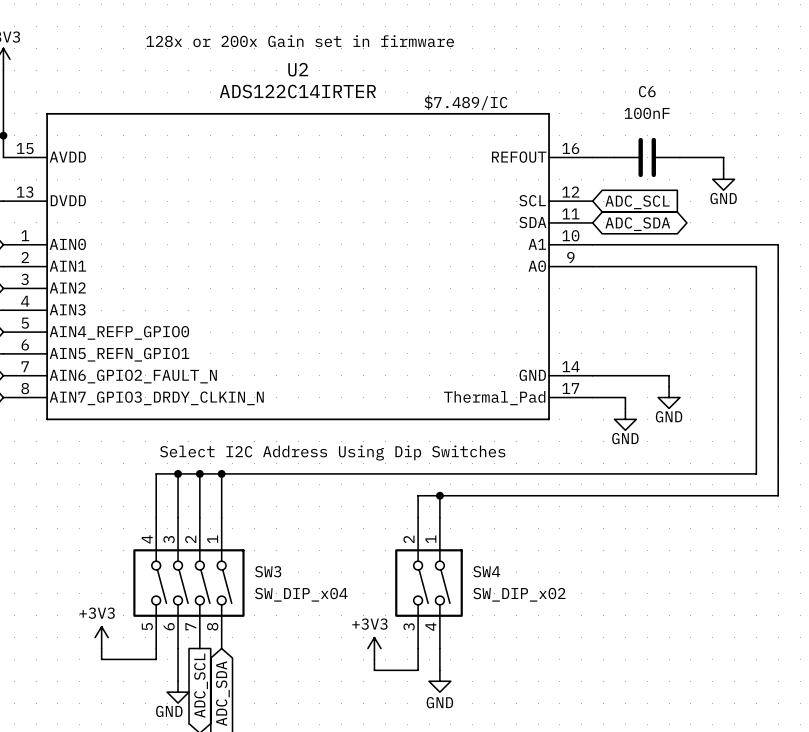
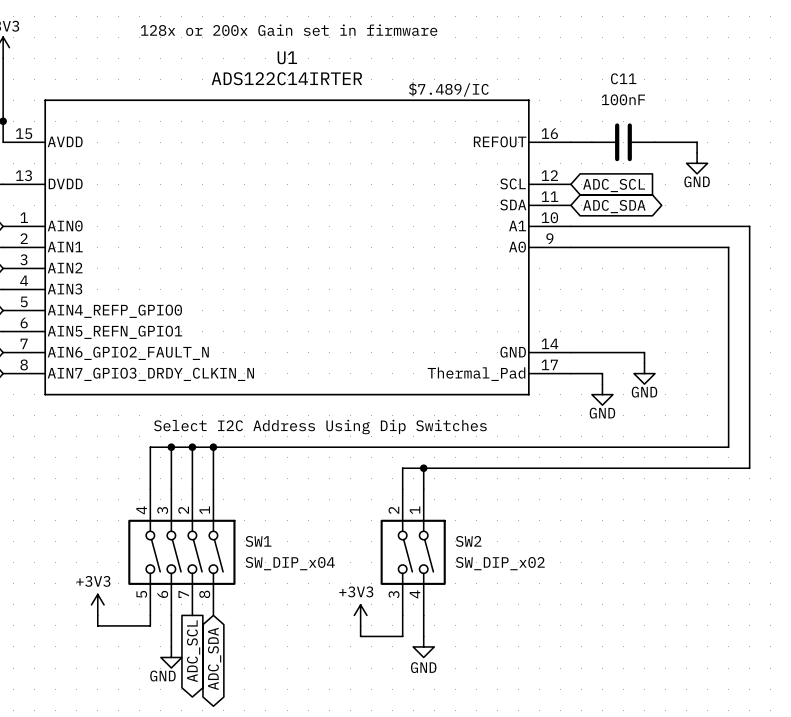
U2 name: U2 (298, 69) -> U1 (287, 57)
C6 name: C6 (647, 91) -> C11 (623, 78)
SW3 name: SW3 (268, 571) -> SW1 (258, 541)
SW4 name: SW4 (486, 571) -> SW2 (468, 541)

